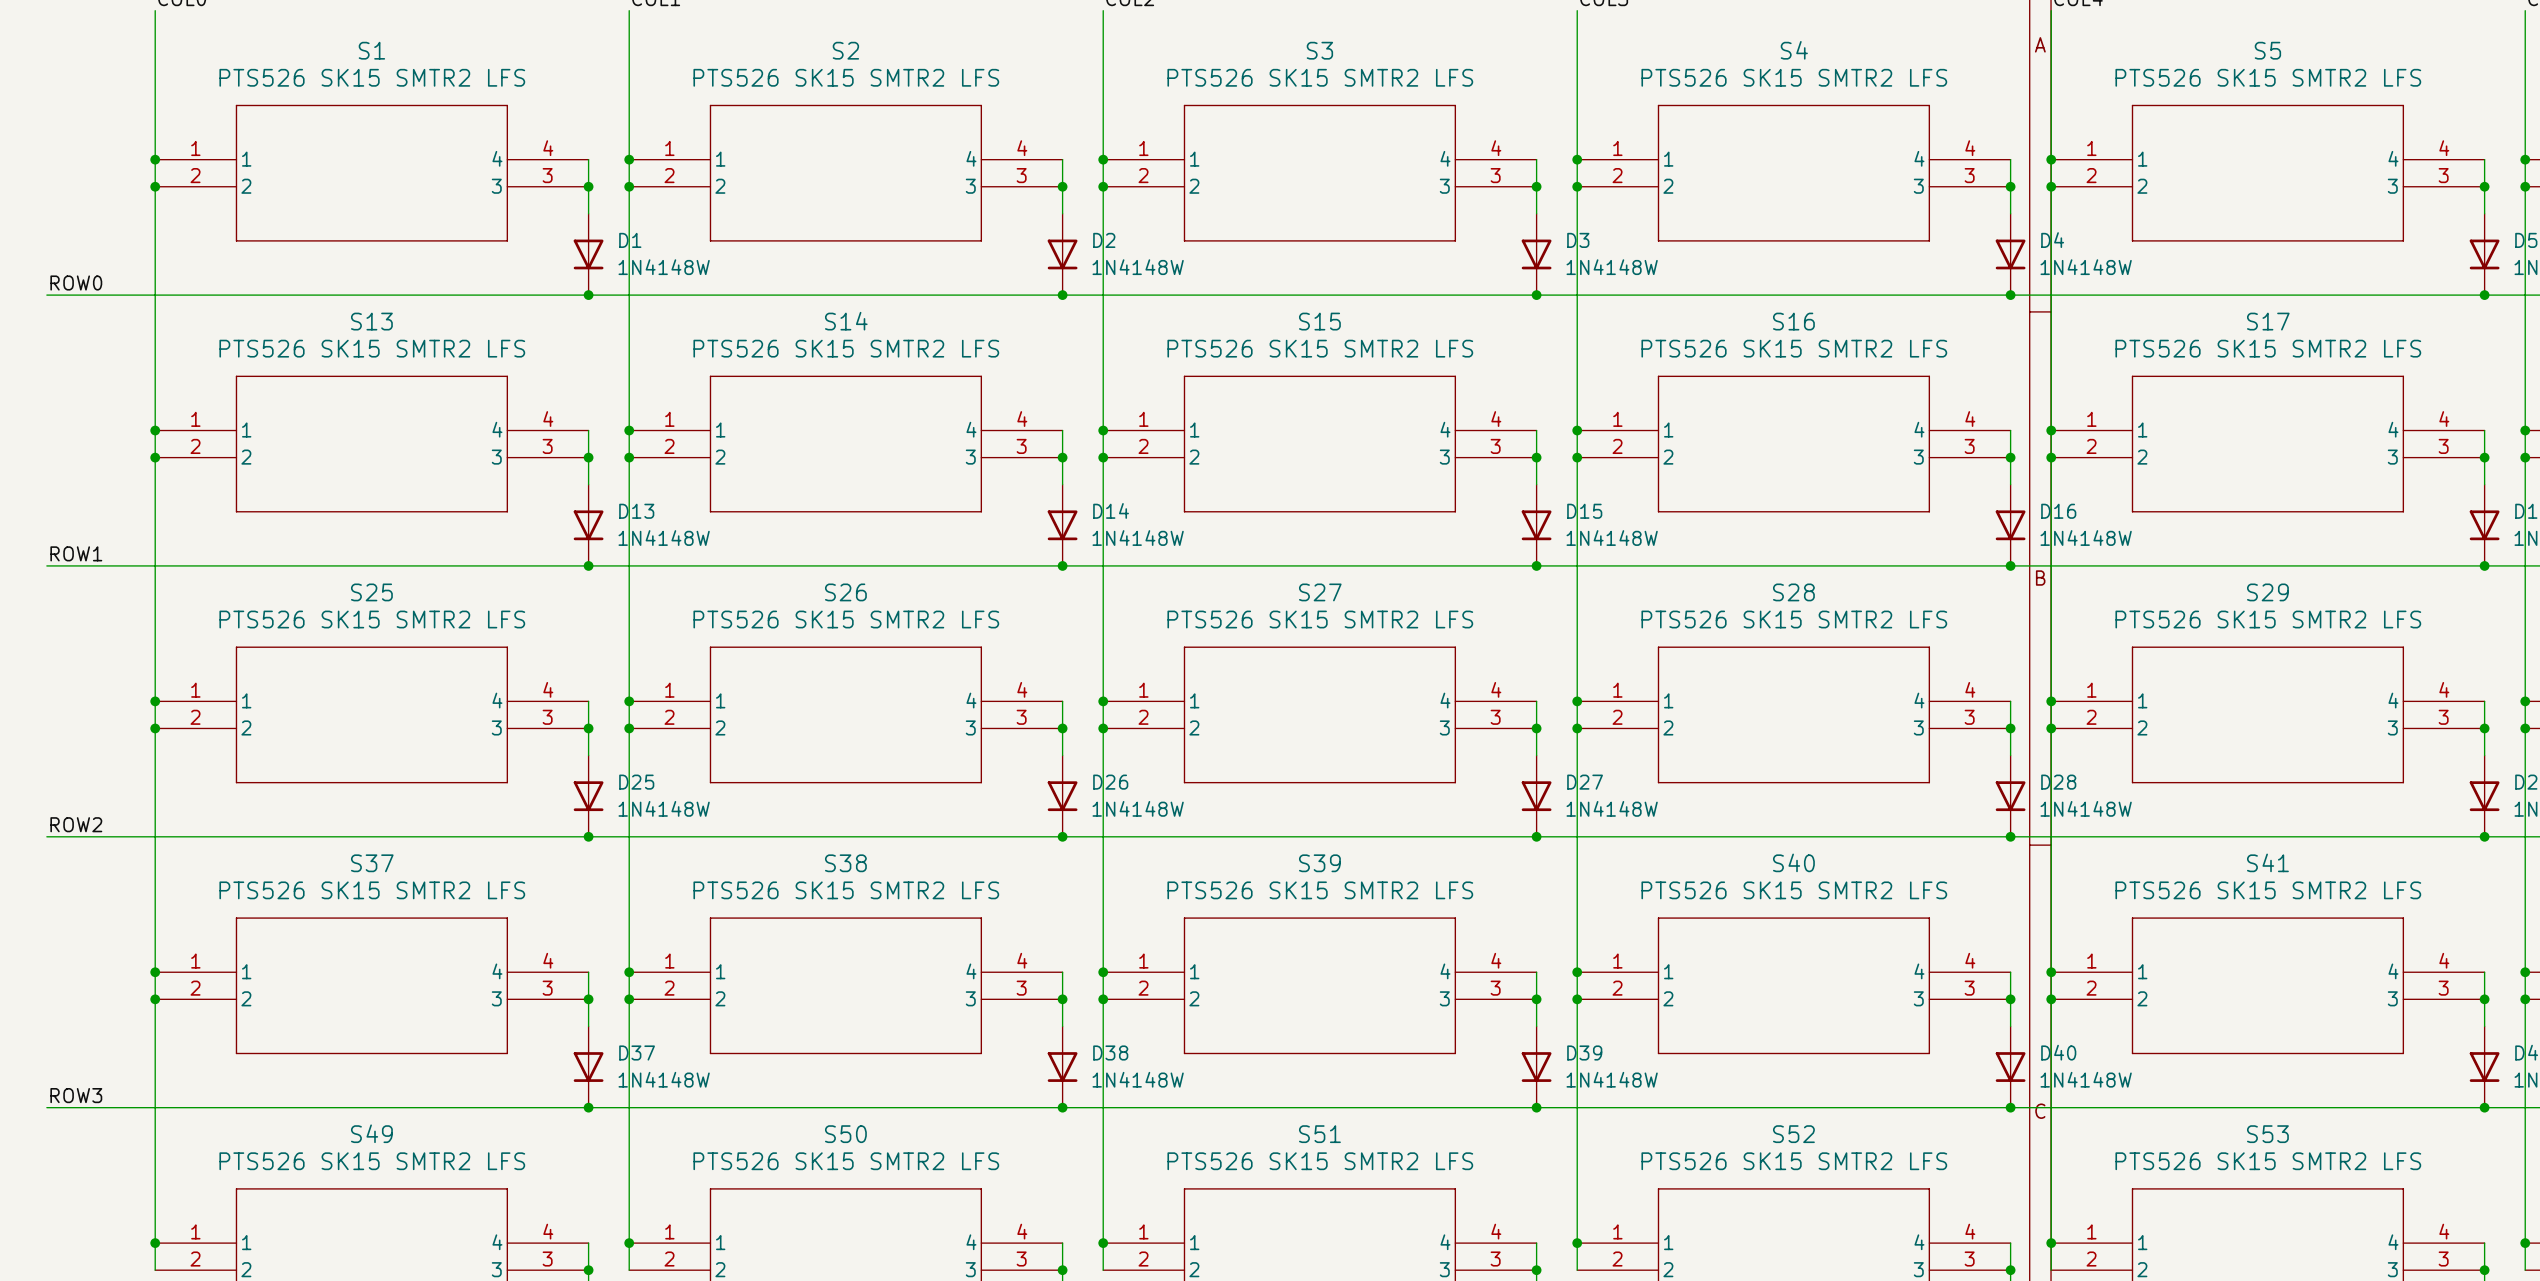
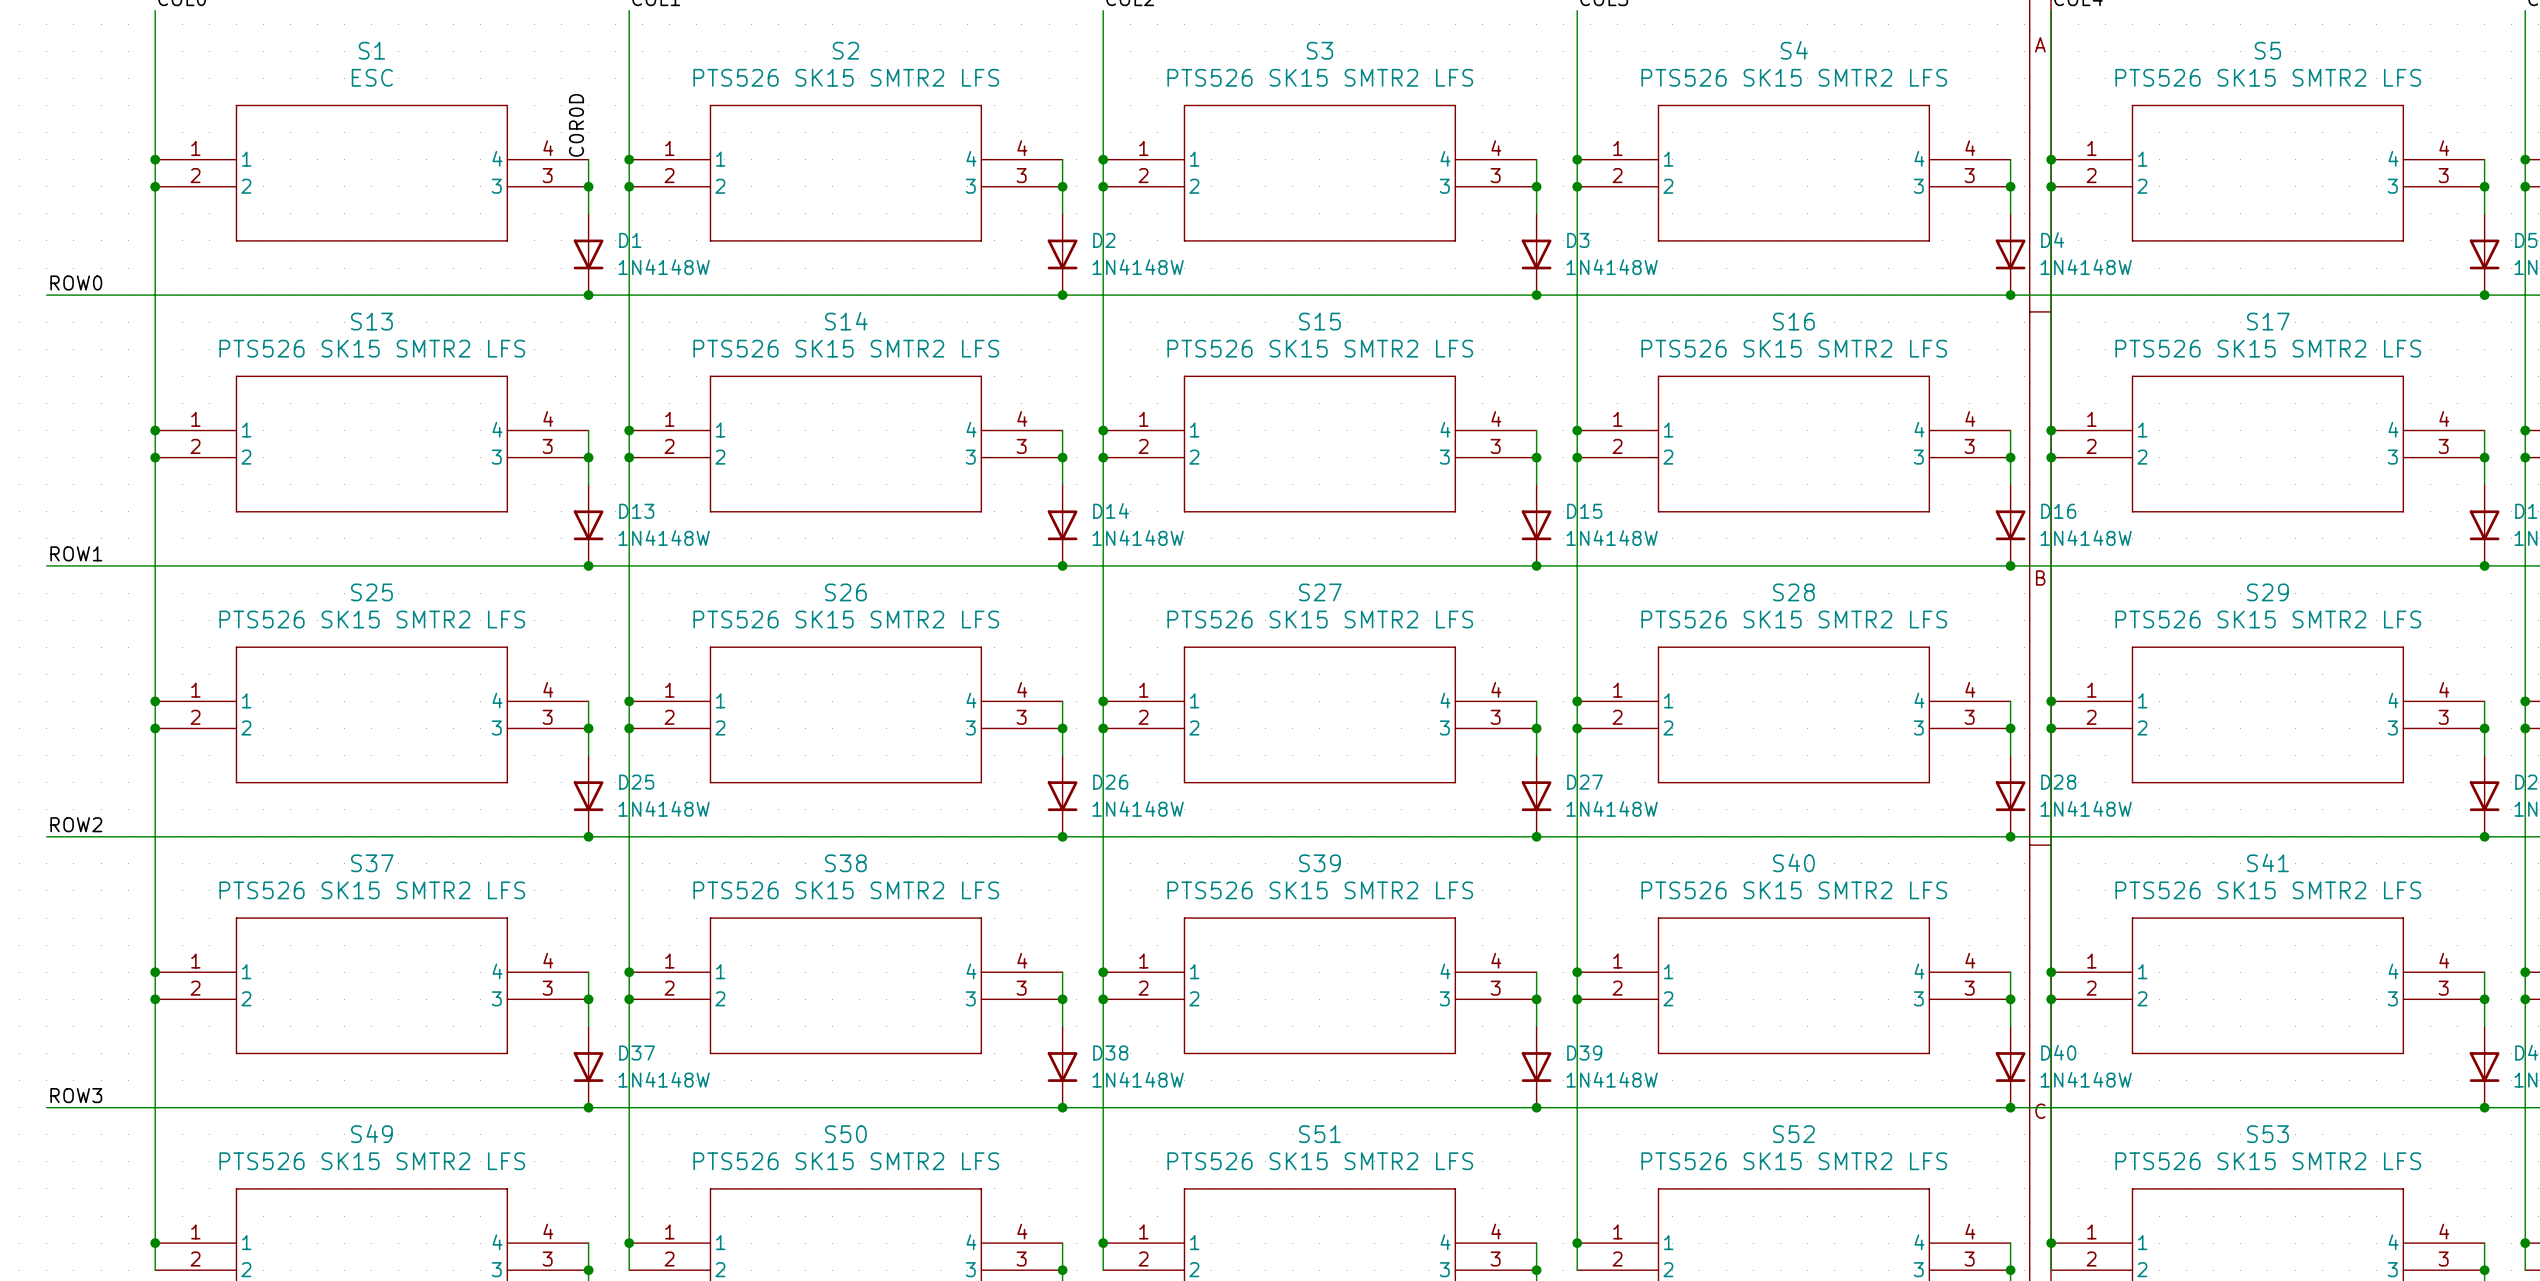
S1 value: PTS526 SK15 SMTR2 LFS (372, 77) -> ESC (372, 77)
label: none -> C0R0D (576, 125)

